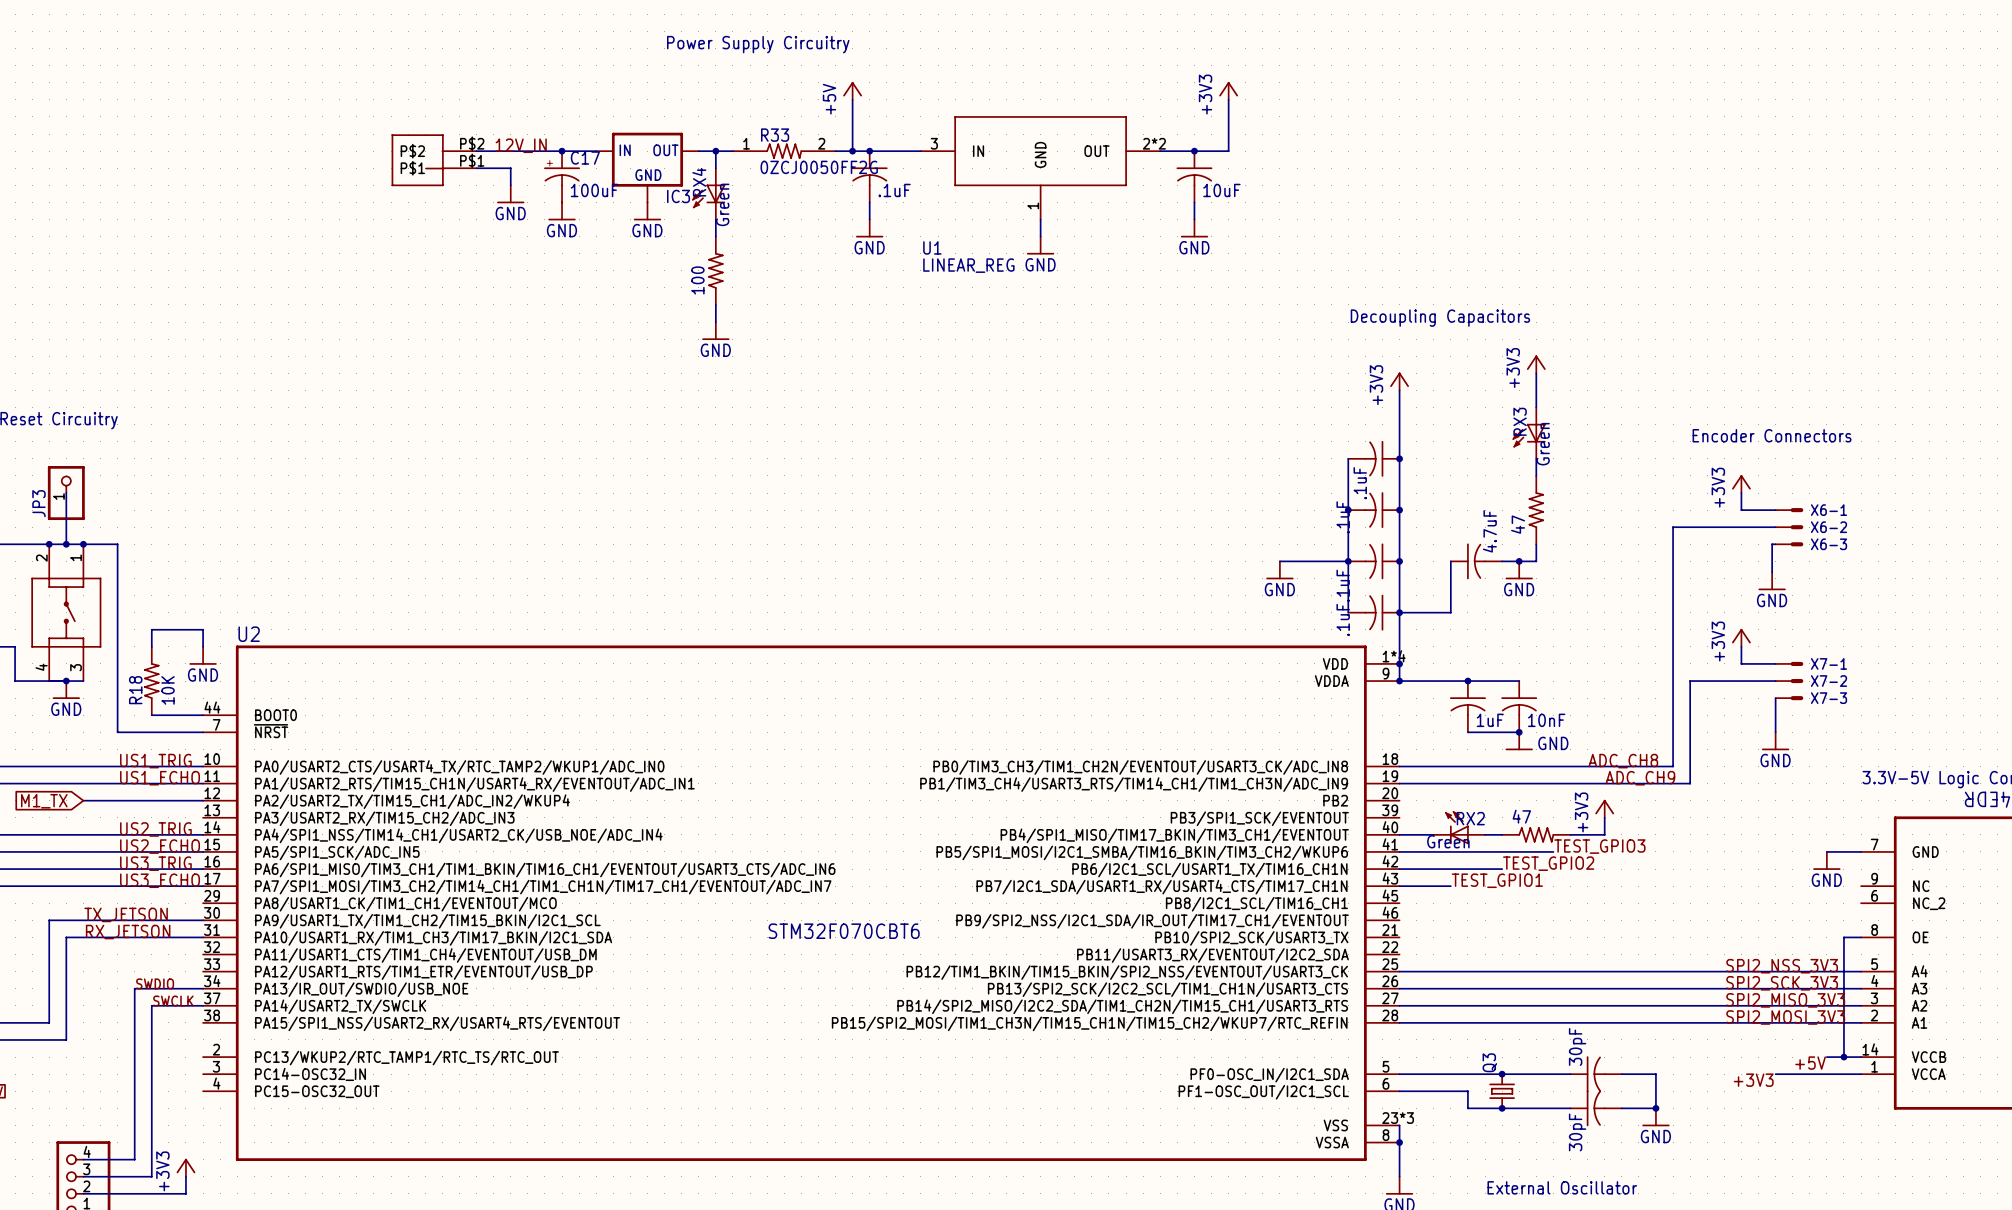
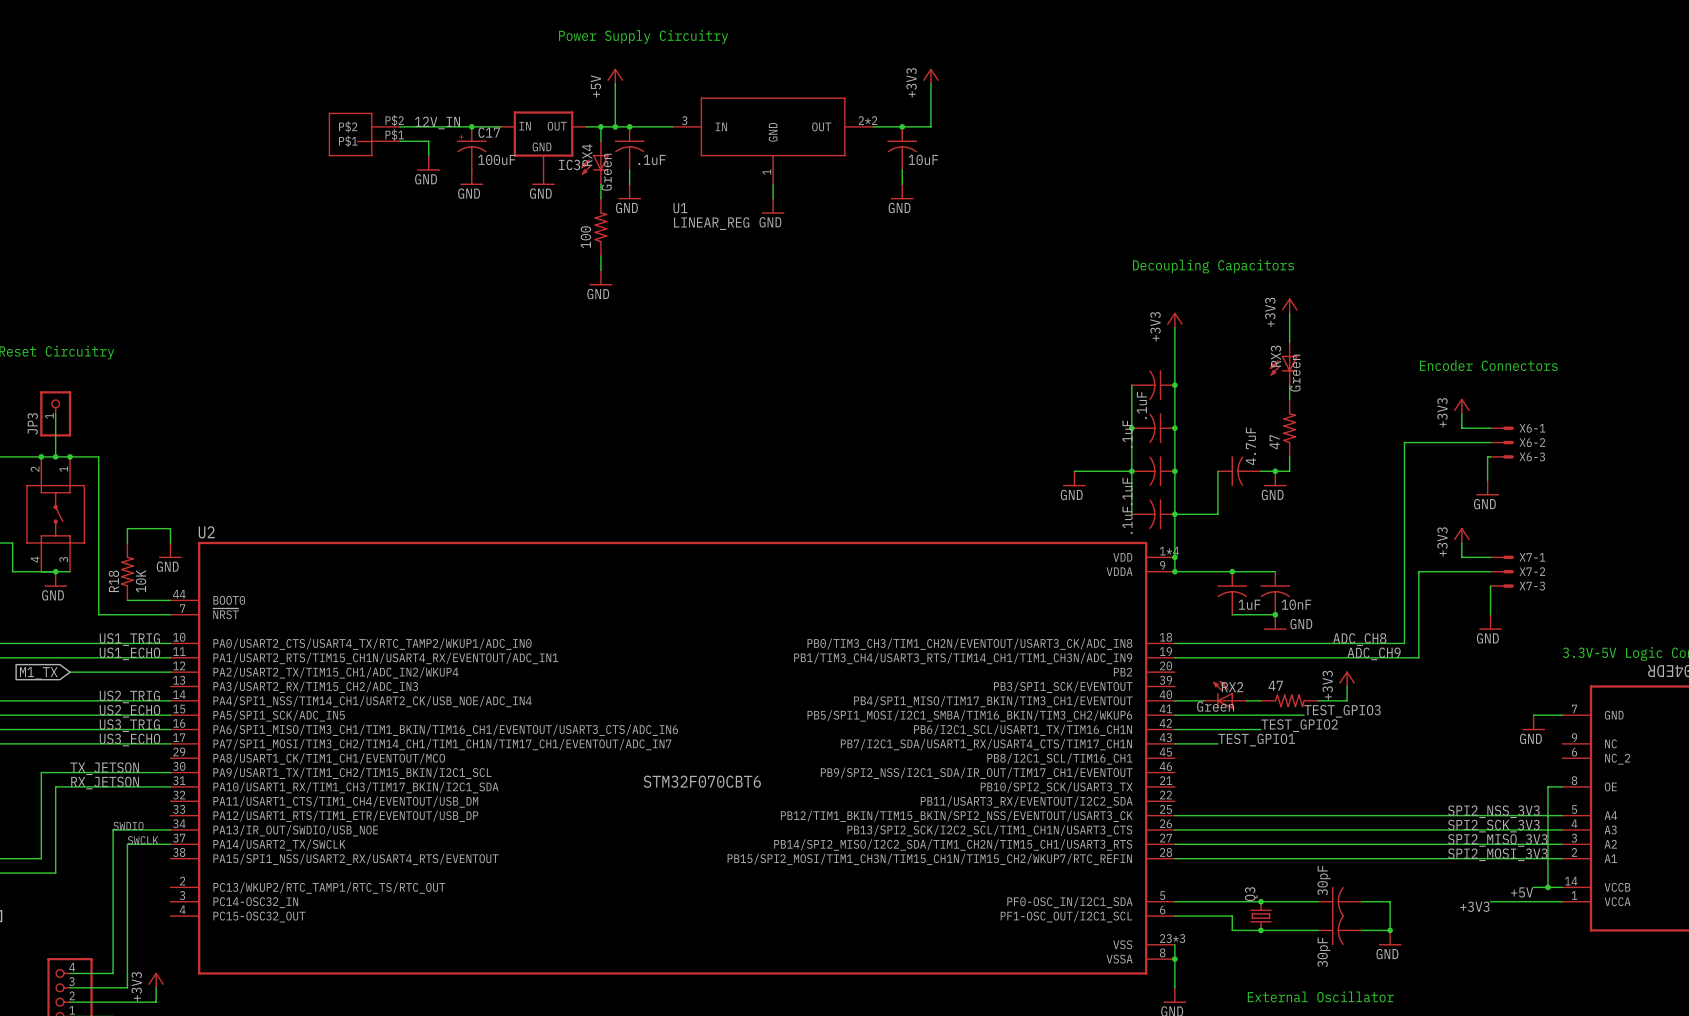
power symbol position: +5V (852, 90) -> +5V (615, 76)
power symbol position: +3V3 (1228, 90) -> +3V3 (930, 76)
wire: none -> (615, 83) (615, 126) (672, 126)
wire: (852, 99) (852, 151) -> none
wire: (1228, 99) (1228, 151) (1160, 151) -> (930, 83) (930, 126) (873, 126)
junction: none -> (615, 126)
junction: none -> (629, 126)
R33: 0ZCJ0050FF2G (784, 151) -> none
wire: (835, 151) (920, 151) -> none
junction: (852, 151) -> none
junction: (869, 151) -> none
junction: none -> (902, 126)
junction: (1194, 151) -> none
U1 position: (1040, 167) -> (773, 140)
part position: (869, 176) -> (629, 148)
part position: (1194, 176) -> (902, 148)
wire: (869, 202) (869, 219) -> (629, 169) (629, 184)
wire: (1194, 202) (1194, 219) -> (902, 169) (902, 184)
wire: (1040, 219) (1040, 236) -> (773, 184) (773, 198)
power symbol: none -> GND (629, 191)
power symbol position: GND (869, 228) -> GND (773, 206)
power symbol: GND (1194, 228) -> none
power symbol position: GND (1040, 245) -> GND (902, 191)

